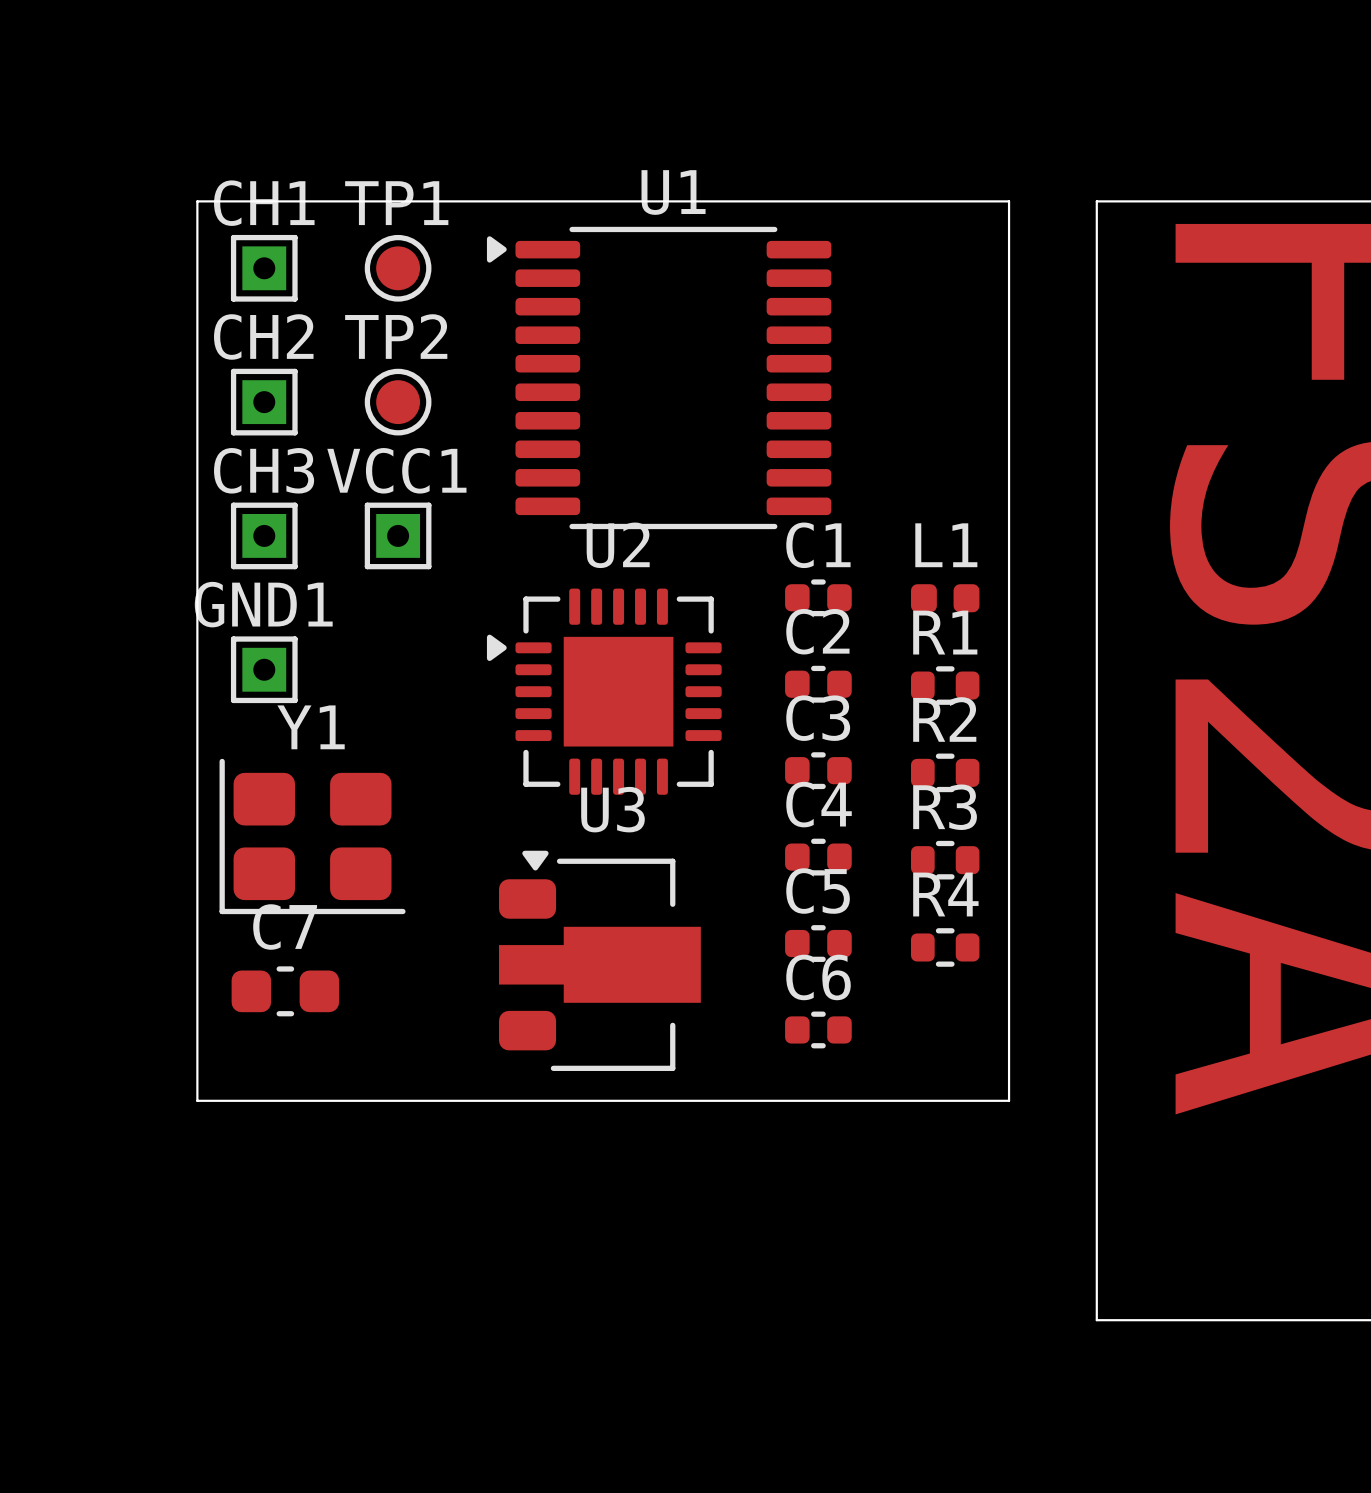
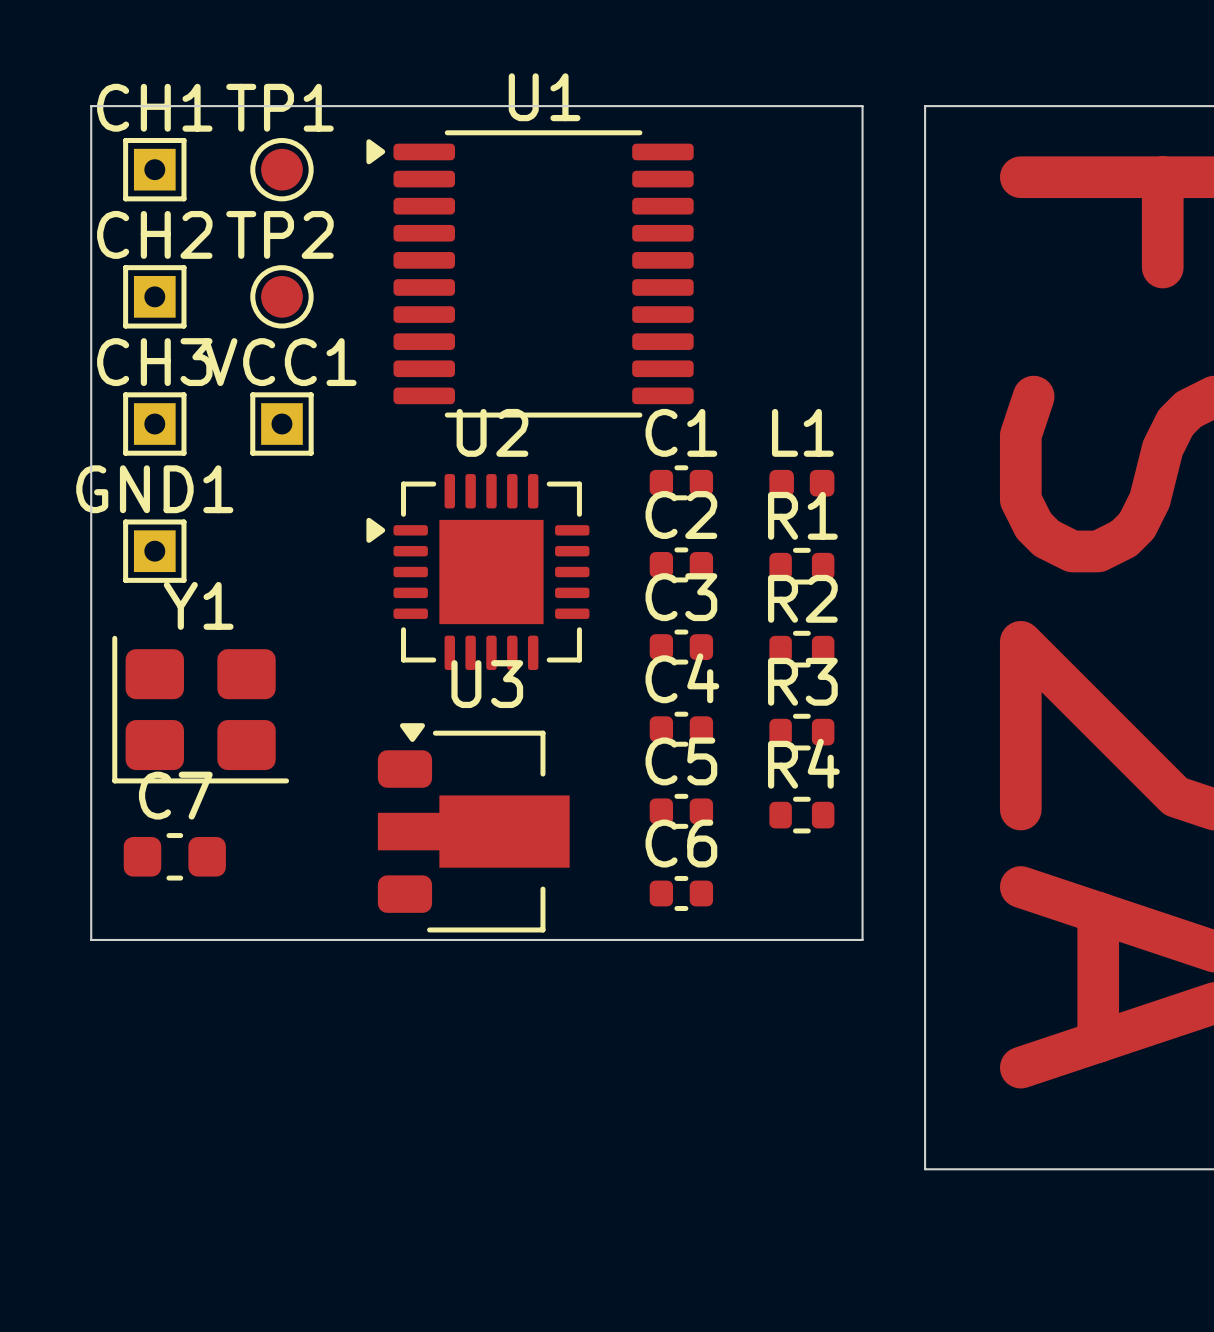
board edge: (1096, 201) (1096, 1320) -> (945, 106) (925, 106) (925, 1169) (945, 1169)
board edge: (197, 1078) (197, 1100) (1009, 1100) (1009, 1078) -> (91, 939) (862, 939)

